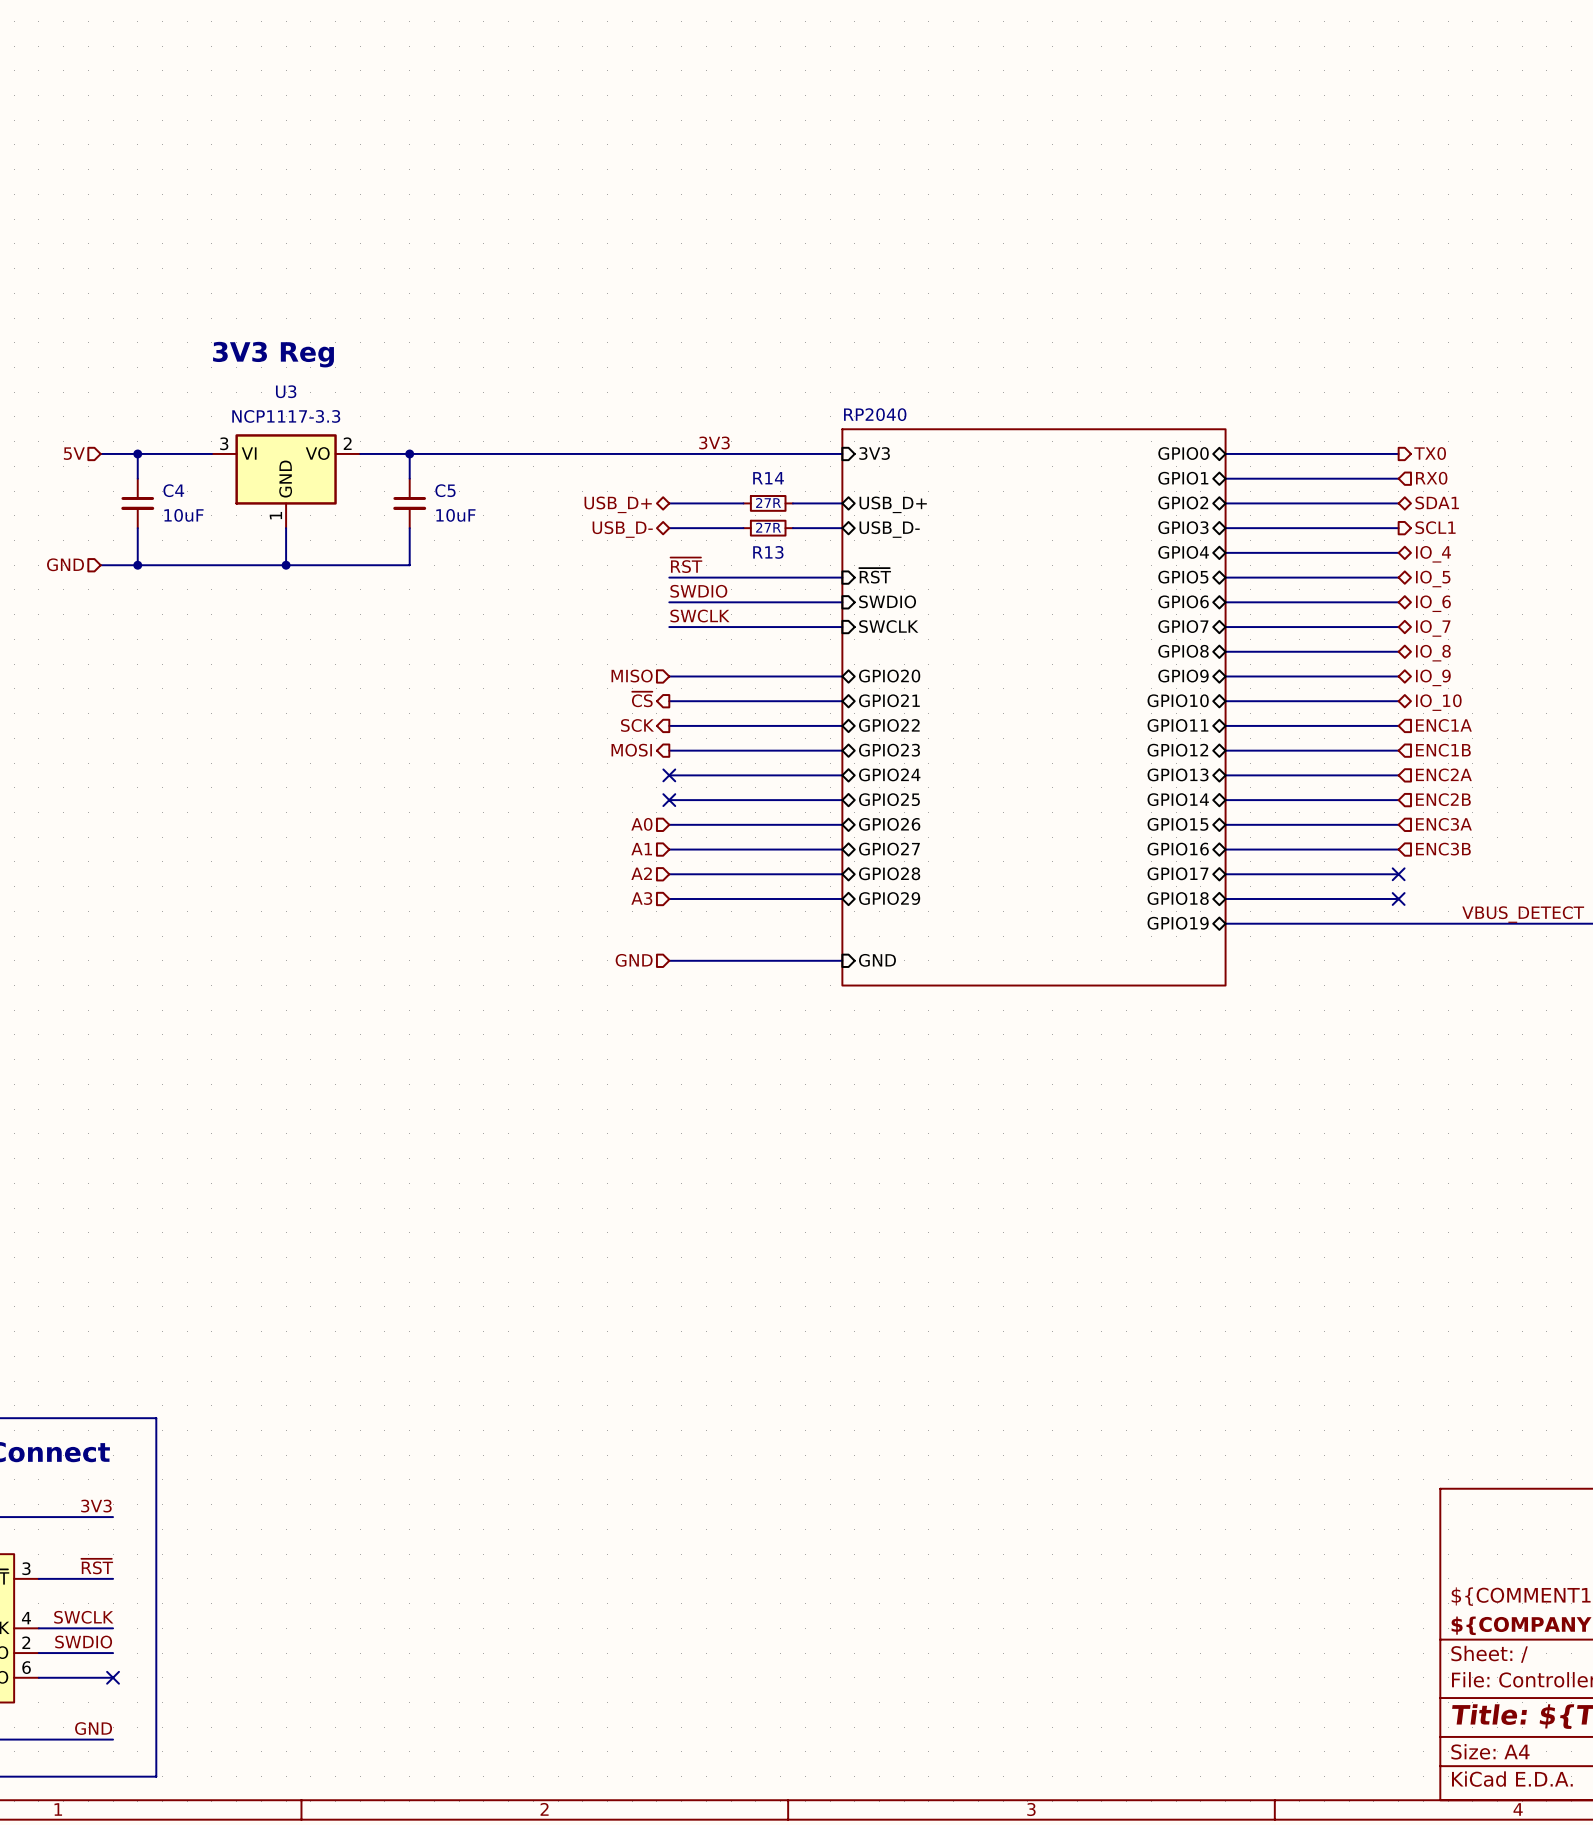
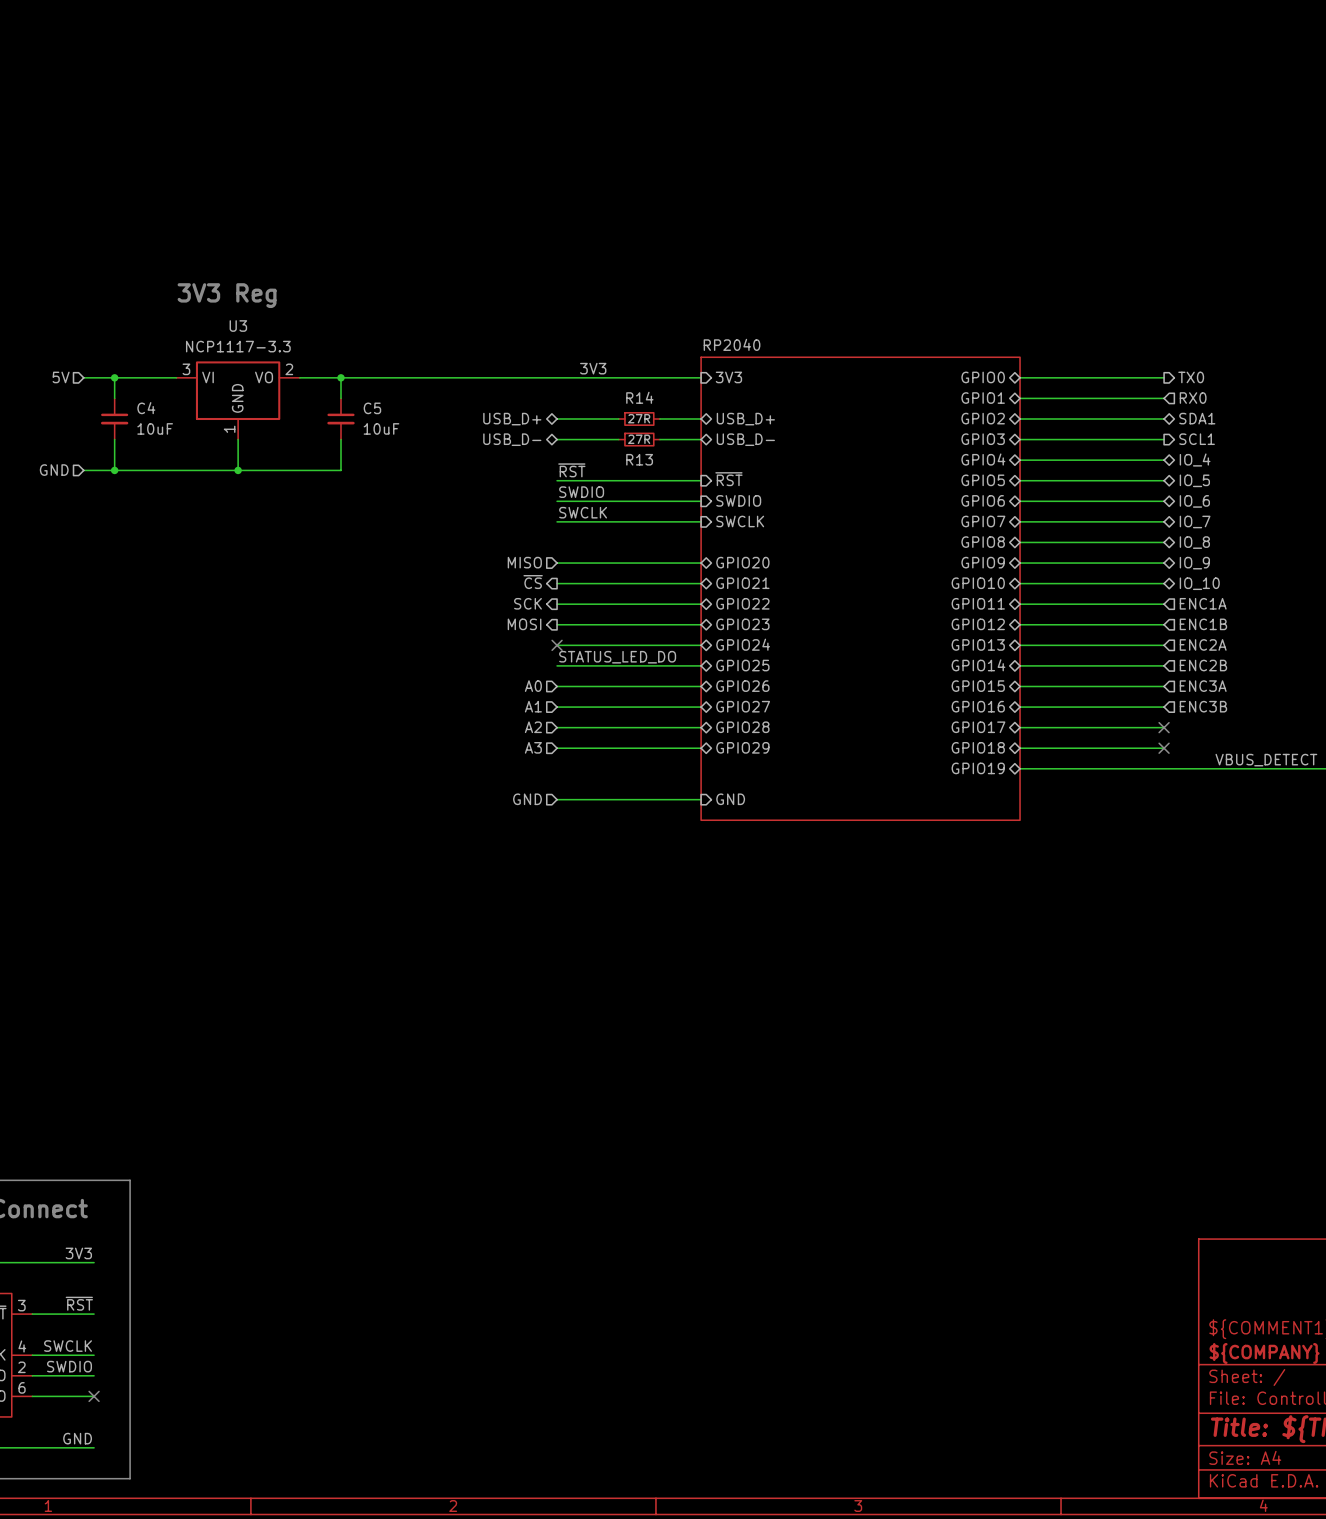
label: none -> STATUS_LED_DO (617, 657)
no-connect mark: (669, 800) -> none

